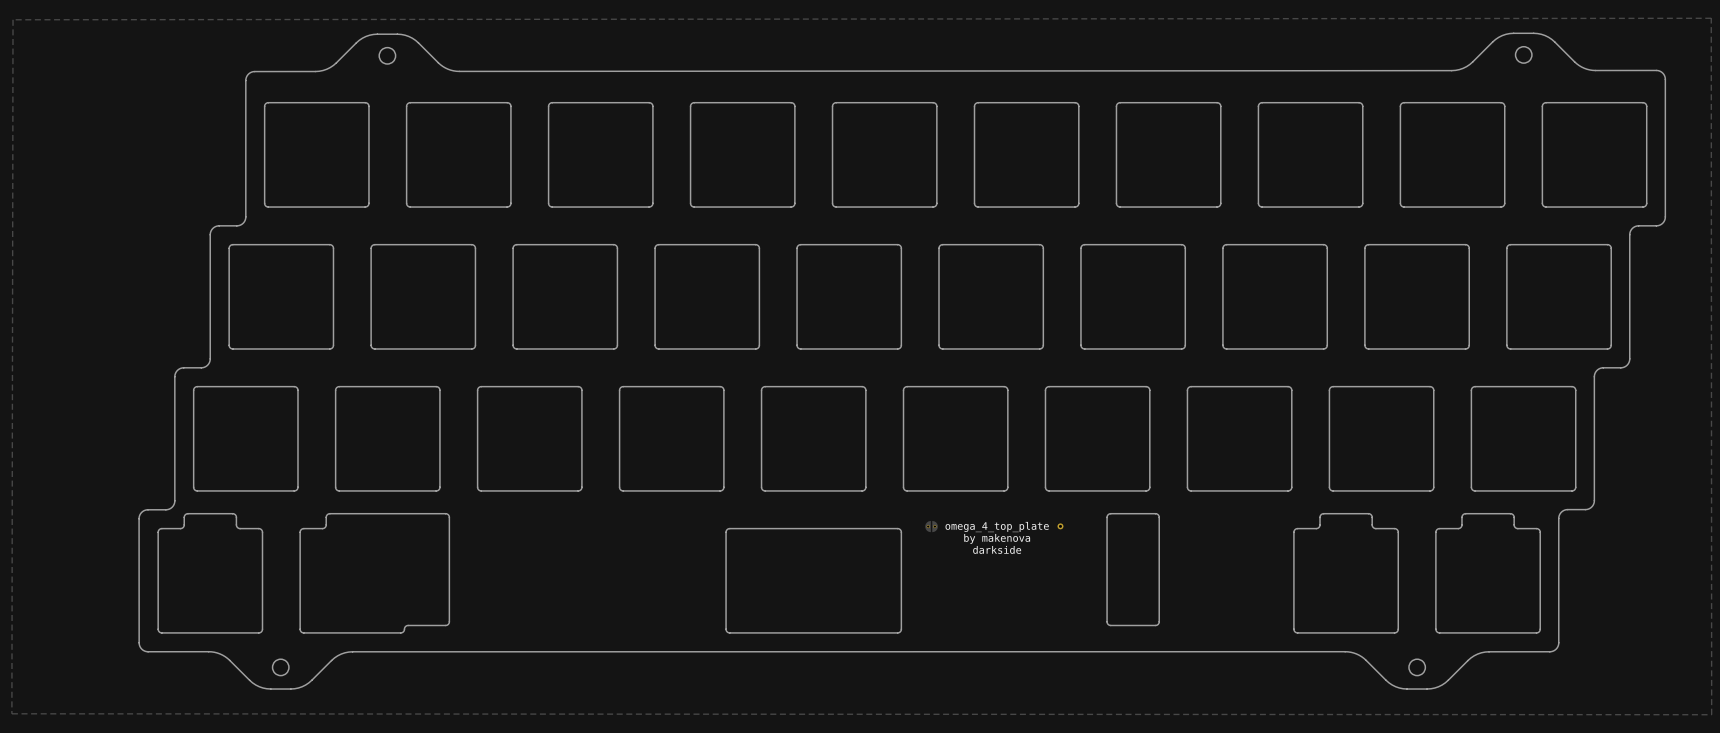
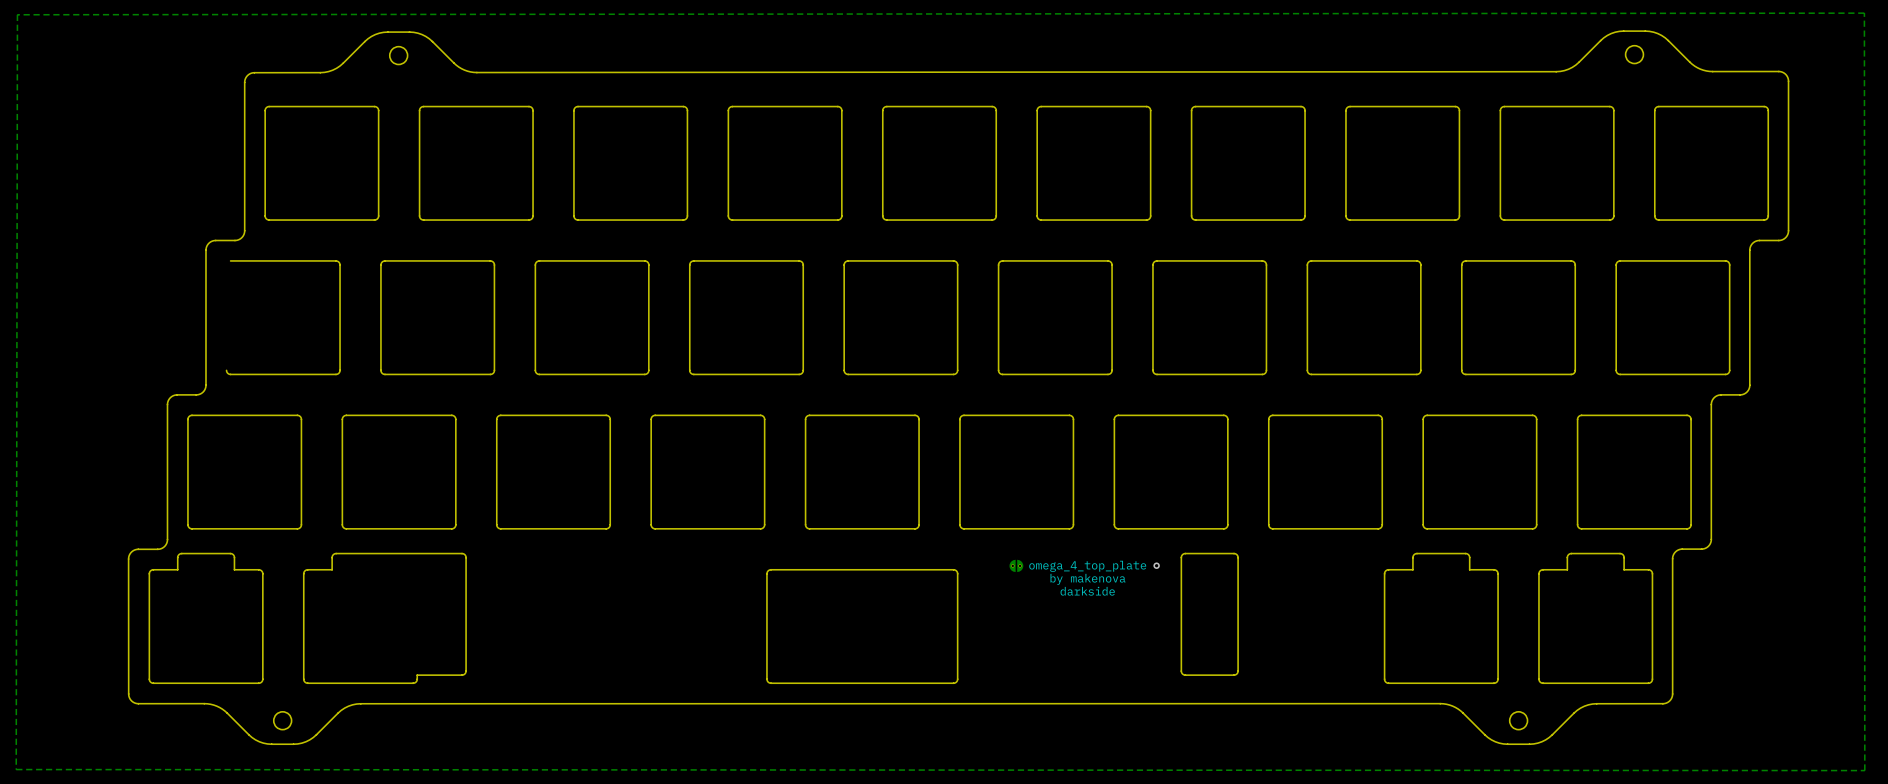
board edge: (1533, 33) (1502, 35) (1492, 42) (1469, 64) (1459, 69) (1451, 70) (459, 71) (442, 66) (418, 42) (408, 36) (377, 34) (365, 36) (359, 40) (333, 65) (323, 70) (251, 72) (245, 80) (245, 219) (239, 225) (215, 226) (210, 233) (209, 361) (203, 367) (180, 368) (174, 375) (174, 503) (168, 509) (145, 510) (139, 516) (139, 646) (146, 651) (217, 653) (227, 658) (252, 682) (259, 686) (270, 689) (302, 686) (311, 680) (334, 657) (341, 654) (352, 651) (1345, 651) (1361, 656) (1386, 680) (1395, 686) (1427, 689) (1442, 685) (1470, 657) (1481, 652) (1553, 651) (1558, 642) (1559, 516) (1565, 509) (1588, 508) (1594, 501) (1594, 374) (1600, 368) (1624, 367) (1629, 360) (1630, 232) (1636, 226) (1659, 225) (1665, 218) (1665, 79) (1663, 73) (1657, 70) (1586, 69) (1576, 63) (1551, 39) (1541, 34) (1533, 33) -> (1701, 549) (1707, 547) (1711, 540) (1711, 402) (1718, 395) (1743, 394) (1749, 386) (1750, 247) (1757, 240) (1782, 239) (1788, 232) (1788, 81) (1787, 76) (1782, 72) (1703, 70) (1692, 64) (1668, 40) (1657, 33) (1649, 31) (1623, 31) (1607, 35) (1575, 64) (1564, 70) (1556, 71) (476, 72) (458, 67) (432, 41) (421, 34) (409, 32) (383, 32) (368, 38) (340, 65) (328, 71) (253, 72) (245, 78) (244, 232) (238, 239) (213, 240) (206, 247) (205, 386) (199, 394) (174, 395) (167, 402) (166, 543) (160, 548) (135, 549) (128, 556) (128, 695) (131, 700) (137, 703) (213, 705) (224, 711) (252, 737) (259, 741) (271, 744) (297, 743) (305, 741) (316, 734) (341, 710) (352, 704) (360, 703) (1440, 703) (1458, 709) (1484, 734) (1495, 741) (1507, 744) (1533, 743) (1549, 737) (1577, 710) (1588, 704) (1662, 703) (1670, 699) (1672, 693) (1672, 556) (1679, 549) (1701, 549)
round board edge position: (1523, 54) -> (1634, 54)
round board edge position: (387, 55) -> (398, 55)
board edge: (694, 102) (690, 106) (691, 205) (791, 207) -> none
board edge: (694, 102) (791, 102) (794, 106) -> none
board edge: (836, 102) (933, 102) (936, 106) -> none
board edge: (836, 102) (832, 106) (832, 203) (836, 207) (935, 205) (936, 106) -> none
board edge: (978, 102) (1075, 102) (1078, 106) -> none
board edge: (978, 102) (974, 106) (974, 203) -> none
board edge: (1120, 102) (1219, 103) (1219, 205) (1117, 205) (1116, 106) (1120, 102) -> none
board edge: (1359, 102) (1259, 103) (1259, 205) (1361, 205) (1362, 106) (1359, 102) -> none
board edge: (652, 106) (652, 203) (649, 207) -> none
board edge: (652, 106) (649, 102) (549, 103) (548, 203) -> none
board edge: (794, 106) (794, 203) (791, 207) -> none
board edge: (1078, 106) (1078, 203) (1075, 207) -> (1150, 110) (1150, 215) (1146, 220)
board edge: (1646, 106) (1646, 203) (1645, 205) (1543, 205) (1543, 103) (1642, 102) (1646, 106) -> none
board edge: none -> (1150, 110) (1146, 106) (1041, 106) (1037, 110) (1038, 218) (1146, 220)
board edge: (264, 203) (265, 103) (367, 103) (367, 205) (268, 207) (264, 203) -> (265, 215) (266, 107) (377, 107) (377, 218) (269, 220) (265, 215)
board edge: (406, 203) (407, 103) (507, 102) (510, 106) (510, 203) (507, 207) -> (419, 215) (420, 107) (528, 106) (533, 110) (533, 215) (528, 220)
board edge: (406, 203) (410, 207) (507, 207) -> (419, 215) (423, 220) (528, 220)
board edge: (548, 203) (552, 207) (649, 207) -> (573, 215) (578, 220) (683, 220)
board edge: (974, 203) (978, 207) (1075, 207) -> none
board edge: none -> (573, 215) (575, 107) (683, 106) (687, 110) (687, 215) (683, 220)
board edge: (1501, 207) (1401, 205) (1401, 103) (1503, 103) (1504, 203) (1501, 207) -> (1609, 220) (1501, 218) (1501, 107) (1612, 107) (1613, 215) (1609, 220)
board edge: none -> (837, 220) (841, 215) (840, 107) (729, 107) (729, 218) (837, 220)
board edge: (329, 244) (230, 245) (230, 347) (332, 347) (333, 248) (329, 244) -> none
board edge: (471, 244) (372, 245) (372, 347) (474, 347) (475, 248) (471, 244) -> none
board edge: (613, 244) (514, 245) (514, 347) (616, 347) (617, 248) (613, 244) -> none
board edge: (755, 244) (656, 245) (656, 347) (758, 347) (759, 248) (755, 244) -> none
board edge: (897, 244) (798, 245) (798, 347) (900, 347) (901, 248) (897, 244) -> (992, 106) (883, 107) (883, 218) (995, 218) (996, 110) (992, 106)
board edge: (1181, 244) (1082, 245) (1082, 347) (1184, 347) (1185, 248) (1181, 244) -> (1301, 106) (1192, 107) (1192, 218) (1303, 218) (1305, 110) (1301, 106)
board edge: (1465, 244) (1366, 245) (1366, 347) (1468, 347) (1469, 248) (1465, 244) -> none
board edge: none -> (230, 260) (335, 260) (340, 265)
board edge: none -> (385, 260) (380, 265) (380, 370)
board edge: none -> (385, 260) (493, 262) (494, 370) (490, 374) (385, 374) (380, 370)
board edge: none -> (539, 260) (644, 260) (648, 265)
board edge: none -> (539, 260) (535, 265) (535, 370)
board edge: none -> (1002, 260) (998, 265) (999, 373) (1110, 373) (1110, 262) (1002, 260)
board edge: none -> (1311, 260) (1307, 265) (1308, 373) (1416, 374)
board edge: none -> (1311, 260) (1419, 262) (1420, 370) (1416, 374)
board edge: none -> (1620, 260) (1616, 265) (1616, 370)
board edge: none -> (1620, 260) (1725, 260) (1729, 265)
board edge: (1327, 248) (1327, 345) (1326, 347) (1224, 347) (1224, 245) (1323, 244) (1326, 245) (1326, 246) (1327, 247) (1327, 248) -> (1459, 110) (1458, 218) (1347, 218) (1347, 107) (1455, 106) (1459, 110)
board edge: none -> (340, 265) (340, 370) (335, 374)
board edge: none -> (648, 265) (647, 373) (539, 374) (535, 370)
board edge: none -> (1575, 265) (1571, 260) (1462, 262) (1461, 370)
board edge: none -> (1575, 265) (1574, 373) (1465, 374) (1461, 370)
board edge: none -> (1729, 265) (1728, 373) (1620, 374) (1616, 370)
board edge: none -> (226, 370) (230, 374) (335, 374)
board edge: none -> (689, 370) (693, 374) (799, 374)
board edge: none -> (689, 370) (690, 262) (799, 260) (803, 265) (803, 370) (799, 374)
board edge: none -> (844, 370) (848, 374) (953, 374)
board edge: none -> (844, 370) (845, 262) (953, 260) (957, 265) (957, 370) (953, 374)
board edge: none -> (1152, 370) (1153, 370) (1153, 371) (1153, 371) (1154, 373) (1157, 374) (1265, 373) (1265, 262) (1154, 262) (1152, 265) (1152, 370)
board edge: (1039, 348) (940, 347) (940, 245) (1042, 245) (1043, 345) (1039, 348) -> (1223, 528) (1115, 527) (1115, 416) (1226, 416) (1227, 524) (1223, 528)
board edge: (1607, 348) (1507, 347) (1507, 245) (1610, 245) (1611, 345) (1607, 348) -> (1764, 220) (1655, 218) (1655, 107) (1767, 107) (1768, 215) (1764, 220)
board edge: (294, 386) (194, 387) (194, 489) (296, 489) (297, 390) (294, 386) -> none
board edge: (436, 386) (336, 387) (336, 489) (438, 489) (439, 390) (436, 386) -> (451, 528) (343, 527) (343, 416) (454, 416) (455, 524) (451, 528)
board edge: (578, 386) (478, 387) (478, 489) (580, 489) (581, 390) (578, 386) -> (606, 528) (497, 527) (497, 416) (609, 416) (610, 524) (606, 528)
board edge: (720, 386) (620, 387) (620, 489) (722, 489) (723, 390) (720, 386) -> none
board edge: (862, 386) (762, 387) (762, 489) (864, 489) (865, 390) (862, 386) -> (805, 524) (809, 528) (917, 527) (917, 416) (806, 416) (805, 419) (805, 524)
board edge: (1004, 386) (904, 387) (904, 489) (1006, 489) (1007, 390) (1004, 386) -> none
board edge: (1146, 386) (1046, 387) (1046, 489) (1148, 489) (1149, 390) (1146, 386) -> none
board edge: (1288, 386) (1188, 387) (1188, 489) (1290, 489) (1291, 390) (1288, 386) -> none
board edge: (1430, 386) (1330, 387) (1330, 489) (1432, 489) (1433, 390) (1430, 386) -> (1532, 528) (1424, 527) (1424, 416) (1535, 416) (1536, 524) (1532, 528)
board edge: (1572, 386) (1472, 387) (1472, 489) (1574, 489) (1575, 390) (1572, 386) -> none
board edge: none -> (192, 415) (187, 419) (187, 524) (192, 528) (300, 527) (301, 419)
board edge: none -> (192, 415) (297, 415) (301, 419)
board edge: none -> (655, 415) (760, 415) (764, 419)
board edge: none -> (655, 415) (651, 419) (651, 524) (655, 528) (763, 527) (764, 419)
board edge: none -> (964, 415) (1069, 415) (1073, 419)
board edge: none -> (964, 415) (959, 419) (959, 524)
board edge: none -> (1581, 415) (1577, 419) (1577, 524)
board edge: none -> (1581, 415) (1687, 415) (1691, 419)
board edge: none -> (1073, 419) (1073, 524) (1069, 528)
board edge: none -> (1382, 419) (1378, 415) (1269, 416) (1268, 524)
board edge: none -> (1382, 419) (1382, 524) (1378, 528)
board edge: none -> (1691, 419) (1691, 524) (1687, 528)
board edge: none -> (959, 524) (964, 528) (1069, 528)
board edge: none -> (1268, 524) (1272, 528) (1378, 528)
board edge: none -> (1577, 524) (1581, 528) (1687, 528)
board edge: (1155, 513) (1110, 513) (1107, 516) (1107, 621) (1109, 625) (1155, 625) (1158, 623) (1159, 517) (1155, 513) -> (1234, 553) (1185, 553) (1181, 556) (1181, 671) (1183, 674) (1234, 675) (1237, 672) (1238, 557) (1234, 553)
board edge: (1323, 513) (1368, 513) (1372, 517) -> none
board edge: (1323, 513) (1320, 516) (1318, 528) (1297, 528) (1294, 531) (1293, 629) (1296, 632) (1394, 632) (1397, 631) (1398, 531) (1395, 528) (1374, 528) (1372, 517) -> none
board edge: (1510, 513) (1464, 513) (1462, 516) (1460, 528) (1439, 528) (1436, 530) (1435, 629) (1437, 632) (1536, 632) (1539, 631) (1540, 531) (1536, 528) (1516, 528) (1513, 516) (1510, 513) -> (1620, 553) (1623, 556) (1624, 569) (1648, 569) (1652, 572) (1651, 681) (1648, 683) (1541, 682) (1538, 679) (1539, 571) (1542, 569) (1567, 569) (1567, 557) (1570, 553) (1620, 553)
board edge: none -> (1465, 553) (1415, 553) (1412, 557) (1412, 569) (1388, 569) (1385, 571) (1384, 679) (1386, 682) (1494, 683) (1497, 681) (1497, 572) (1494, 569) (1469, 569) (1469, 556) (1465, 553)
board edge: (236, 524) (236, 516) (233, 513) (187, 513) (184, 516) (182, 528) (161, 528) -> none
board edge: (236, 524) (239, 528) (259, 528) (262, 531) (262, 629) (259, 632) (159, 631) (158, 532) (161, 528) -> none
board edge: (729, 528) (726, 532) (726, 629) -> (771, 569) (766, 573) (766, 679)
board edge: (729, 528) (899, 529) (901, 532) (901, 629) (897, 632) (729, 632) (726, 629) -> (771, 569) (955, 570) (957, 573) (957, 679) (953, 683) (771, 683) (766, 679)
board edge: (400, 632) (407, 625) (445, 625) (449, 623) (448, 514) (329, 513) (326, 516) (324, 528) (301, 529) (301, 631) (400, 632) -> (413, 683) (416, 681) (417, 675) (462, 675) (465, 672) (464, 554) (335, 553) (332, 556) (332, 569) (304, 570) (304, 682) (413, 683)
board edge: none -> (258, 683) (262, 679) (261, 570) (234, 569) (234, 557) (231, 553) (181, 553) (177, 556) (177, 569) (150, 570) (150, 682) (258, 683)
round board edge position: (280, 667) -> (282, 720)
round board edge position: (1417, 667) -> (1518, 720)

